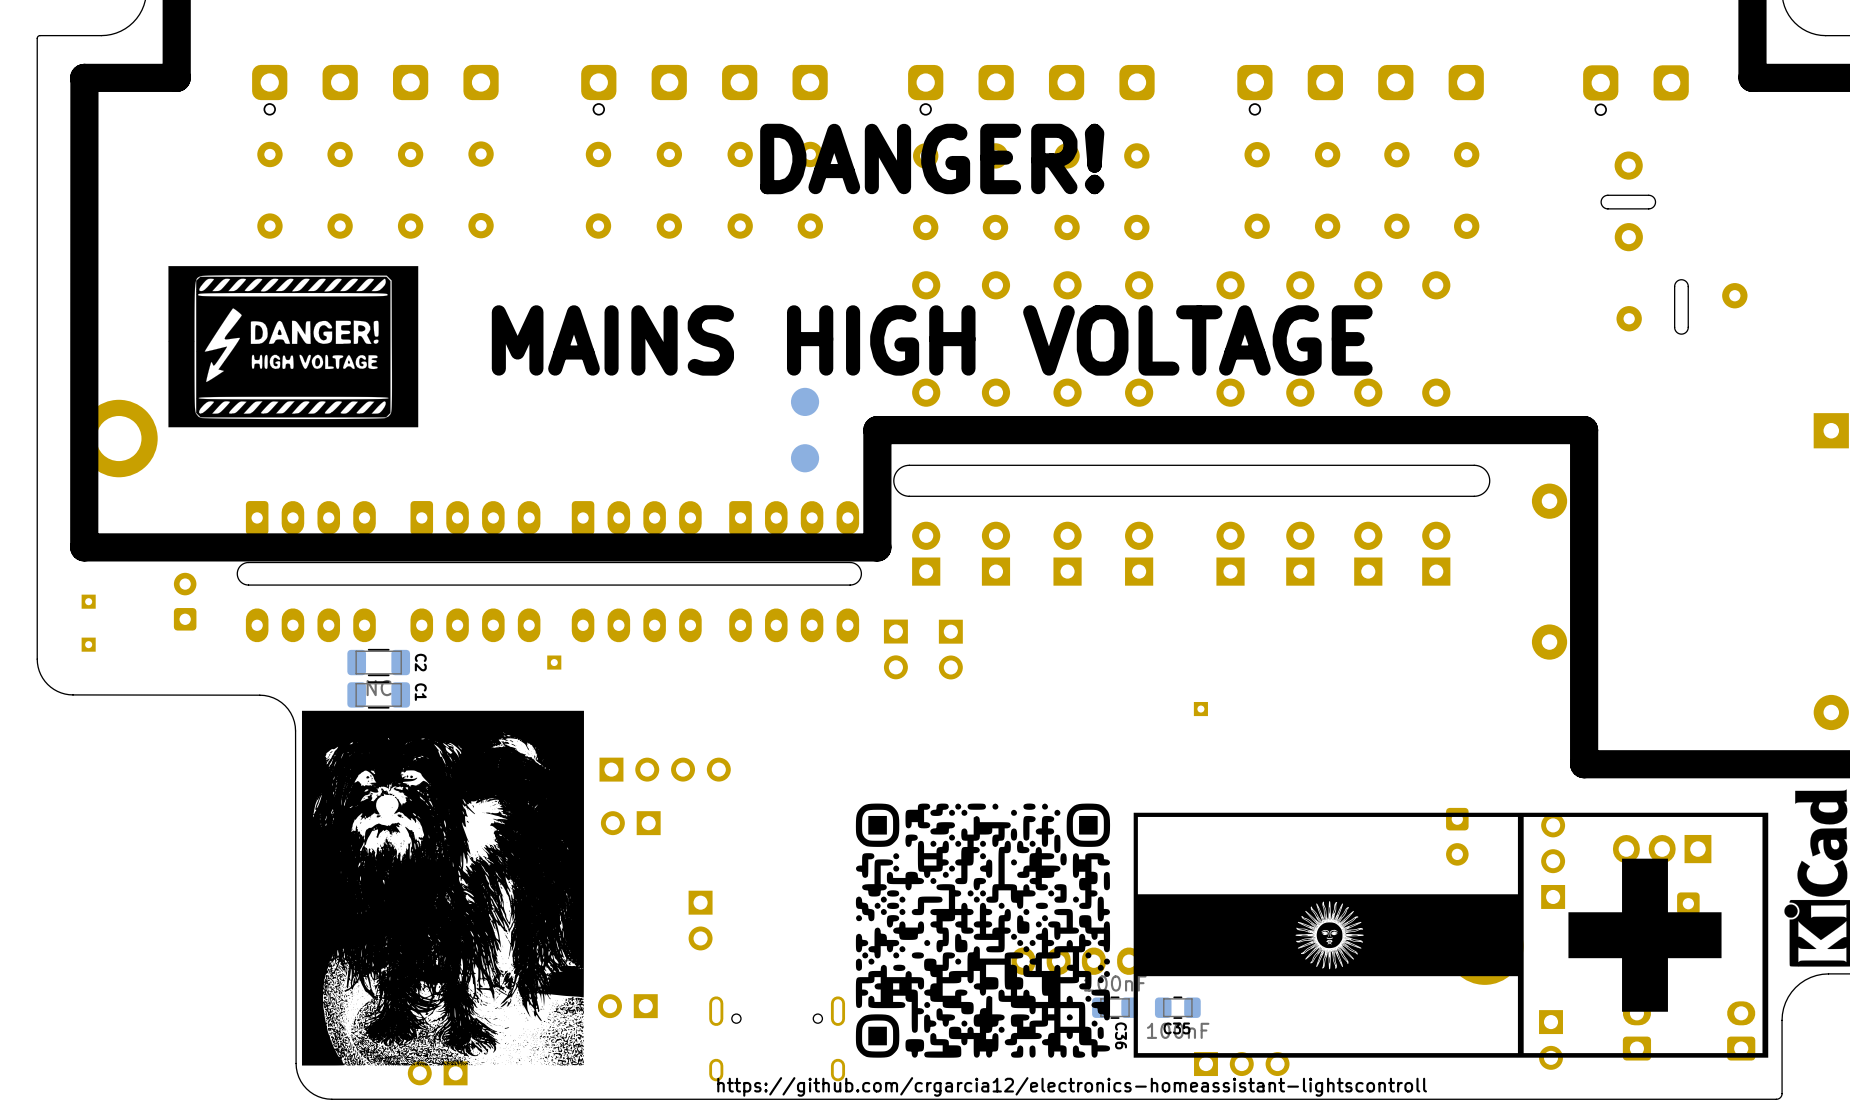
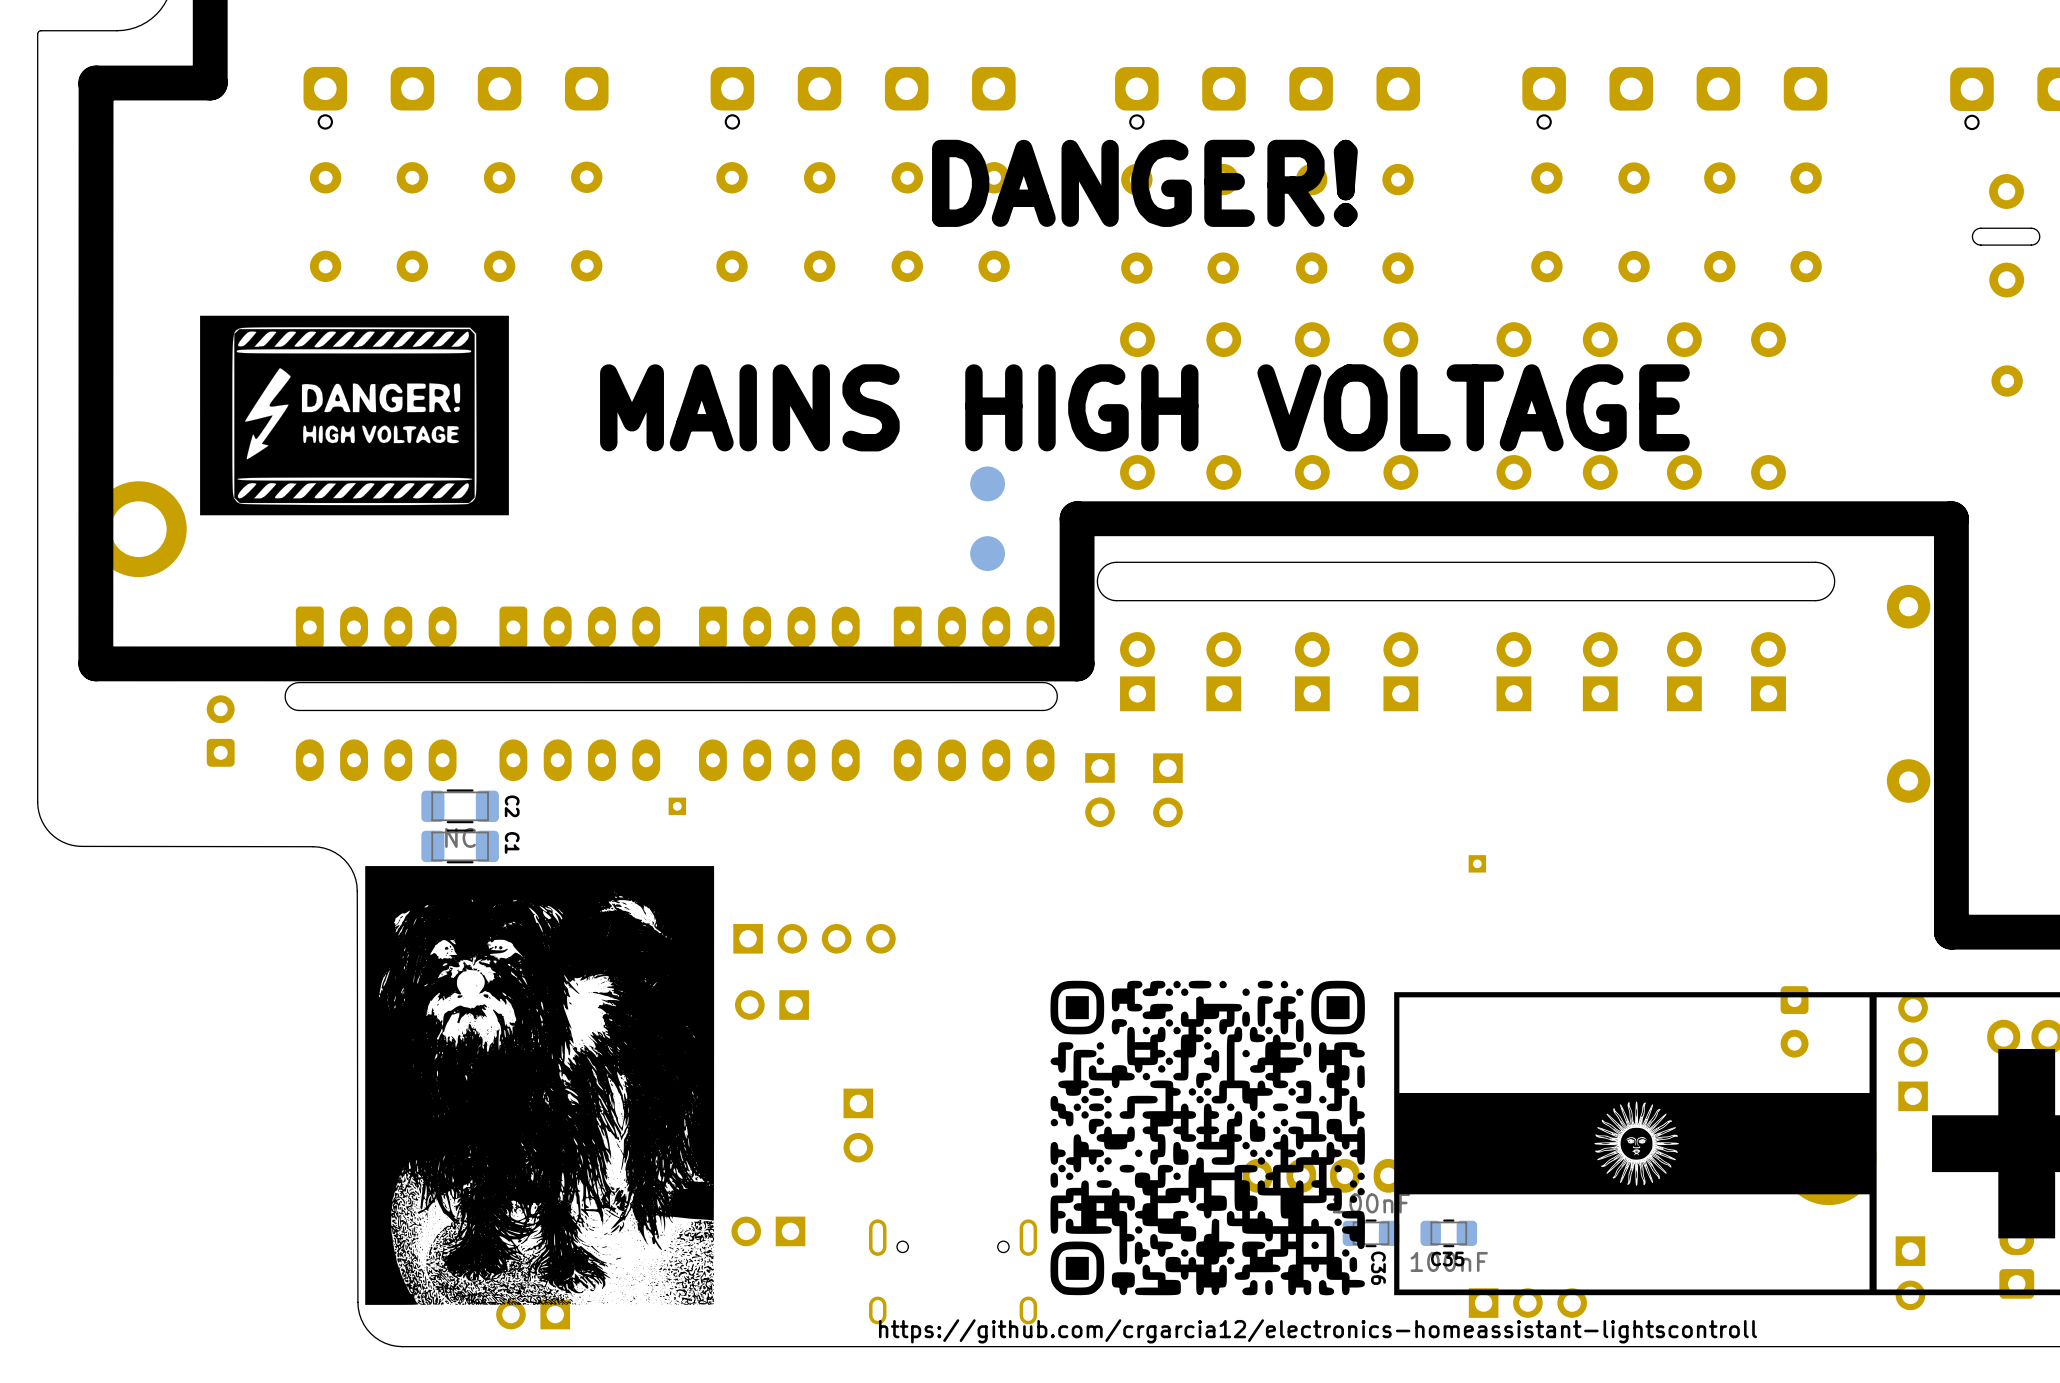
part: (88, 601) -> none
part: (88, 644) -> none

